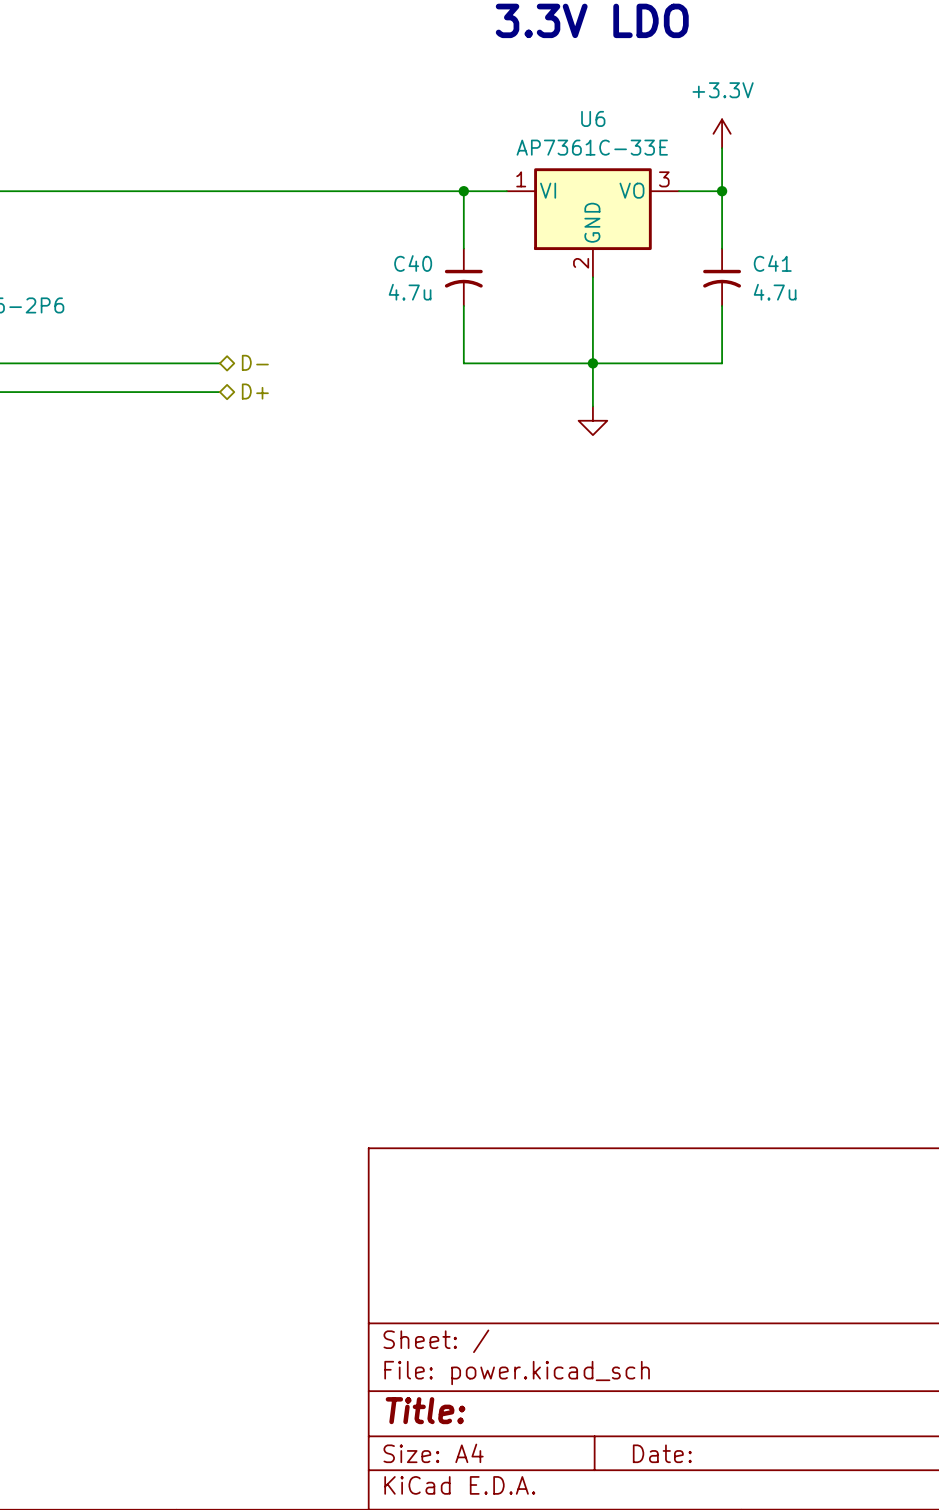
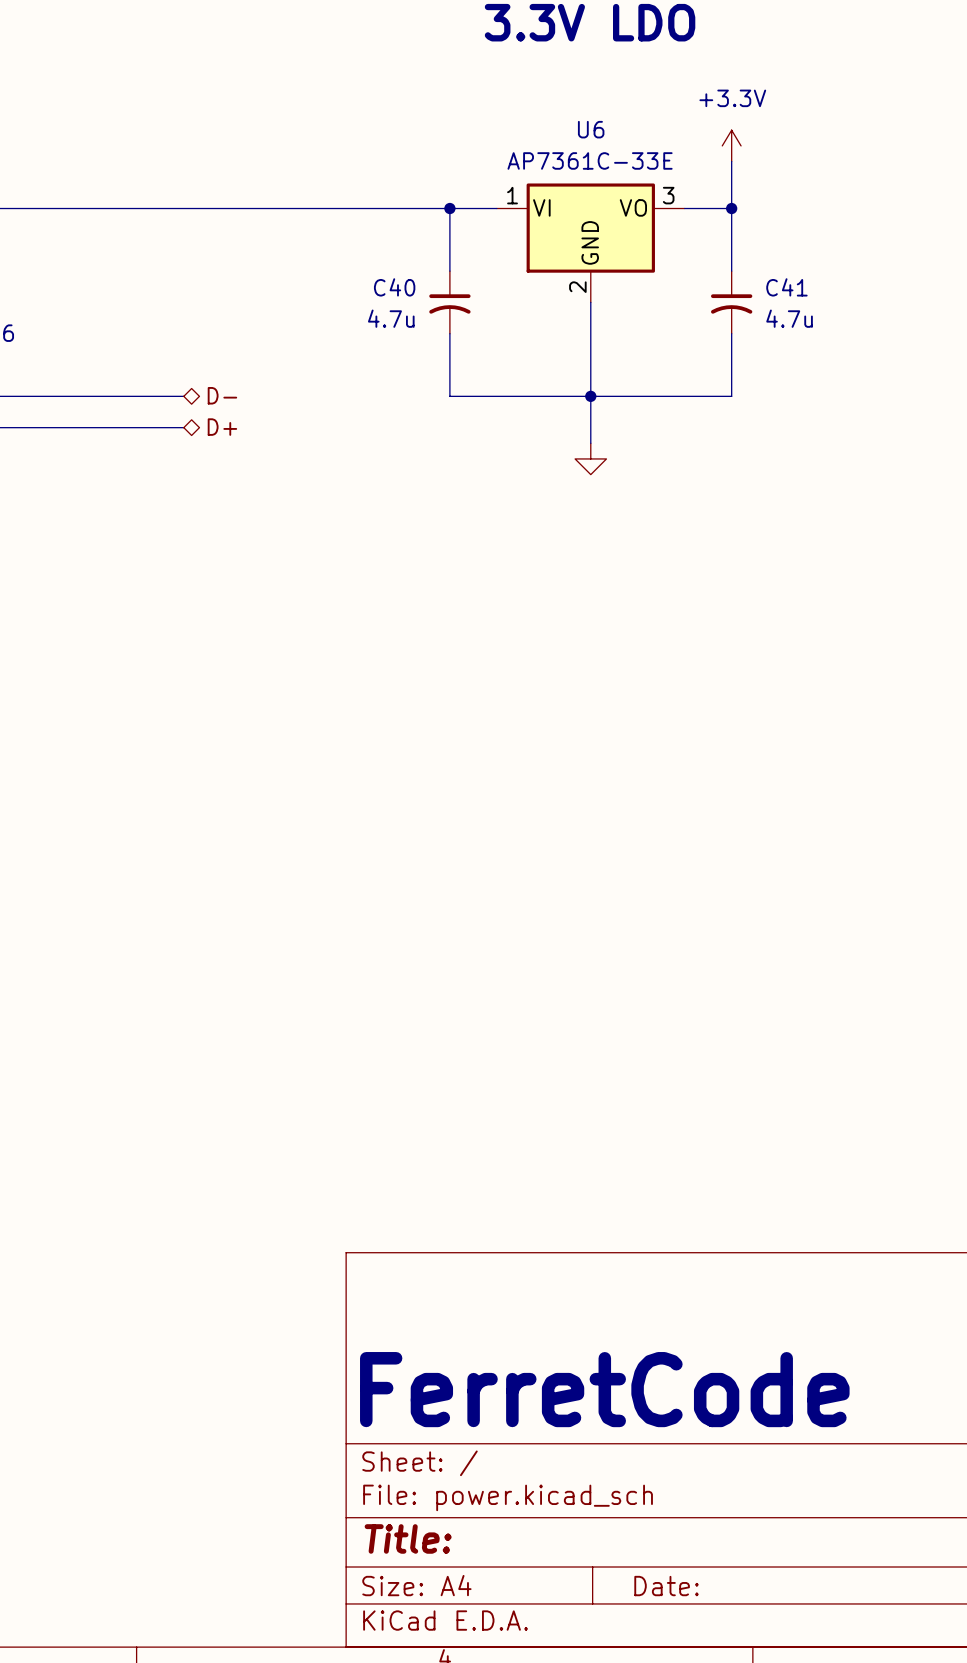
text: none -> FerretCode (604, 1389)

